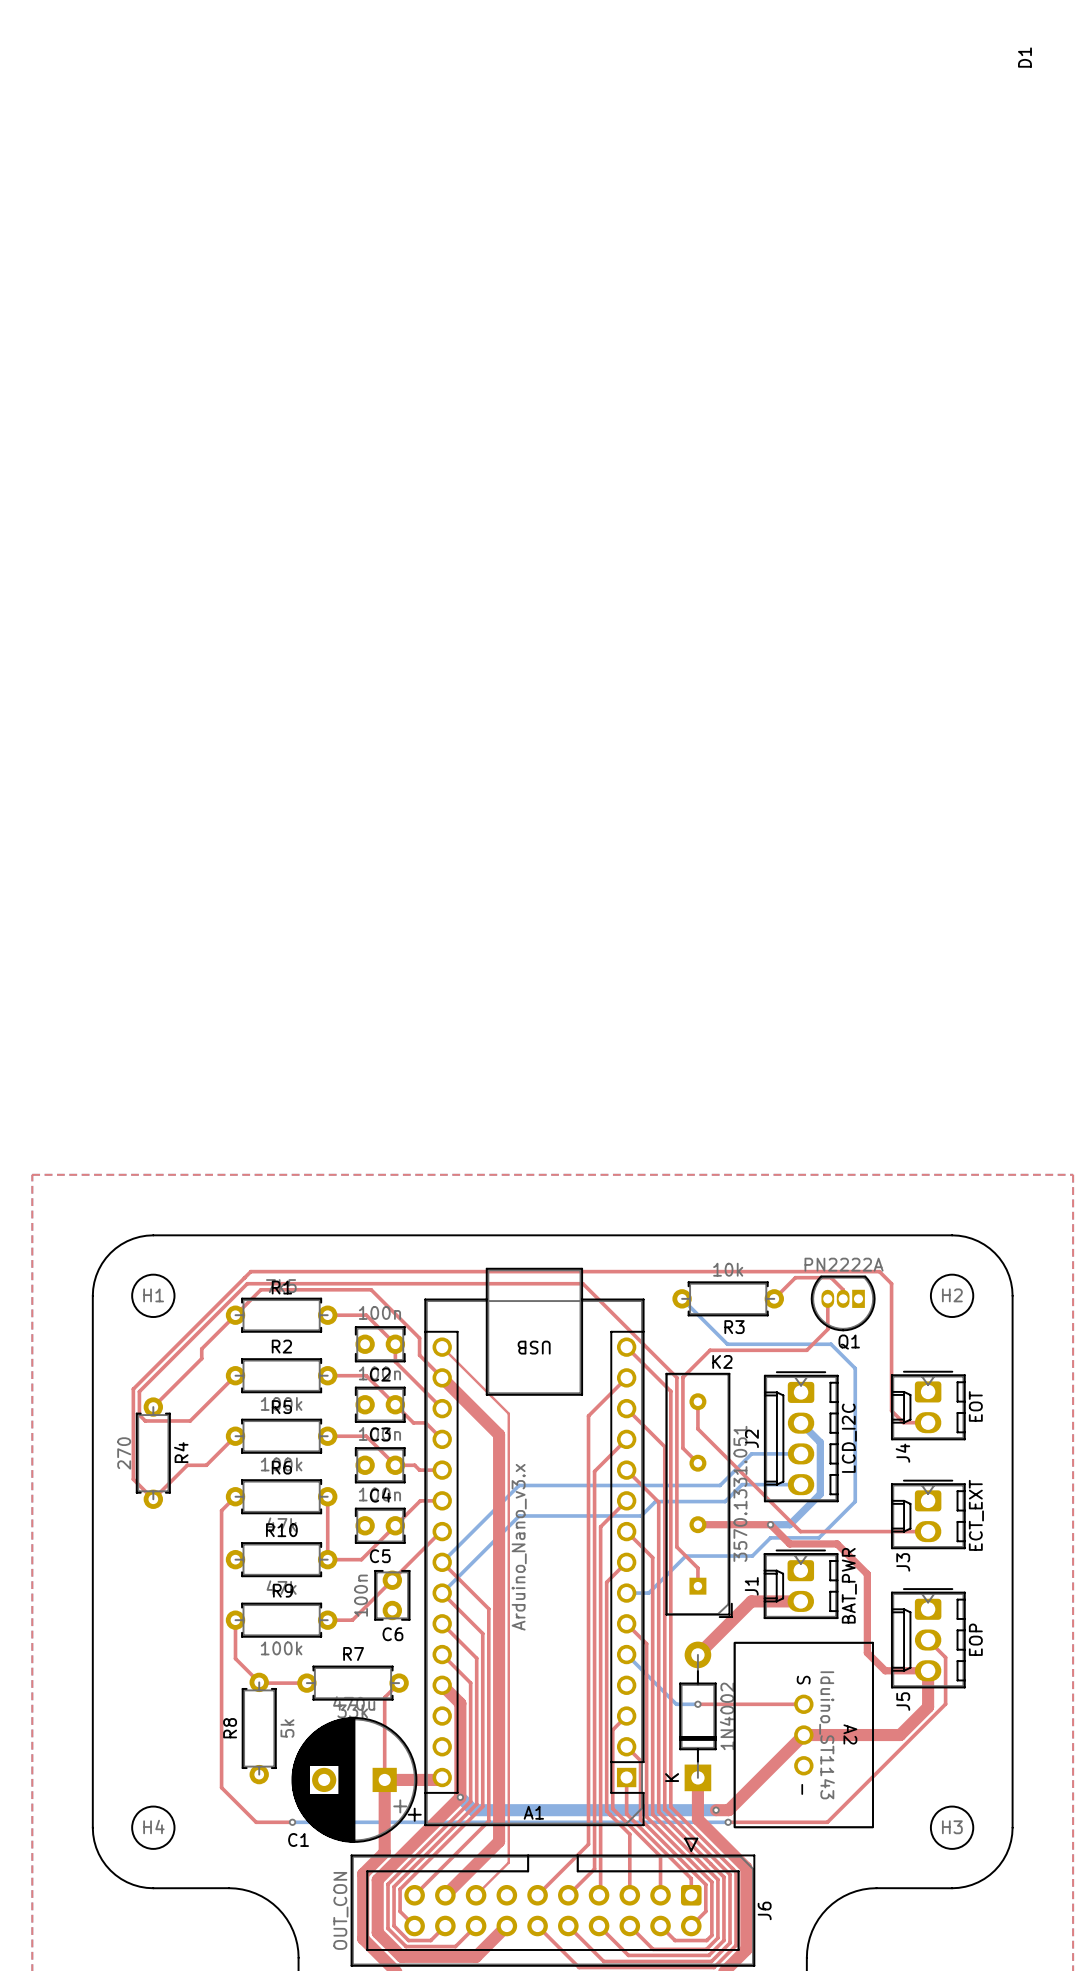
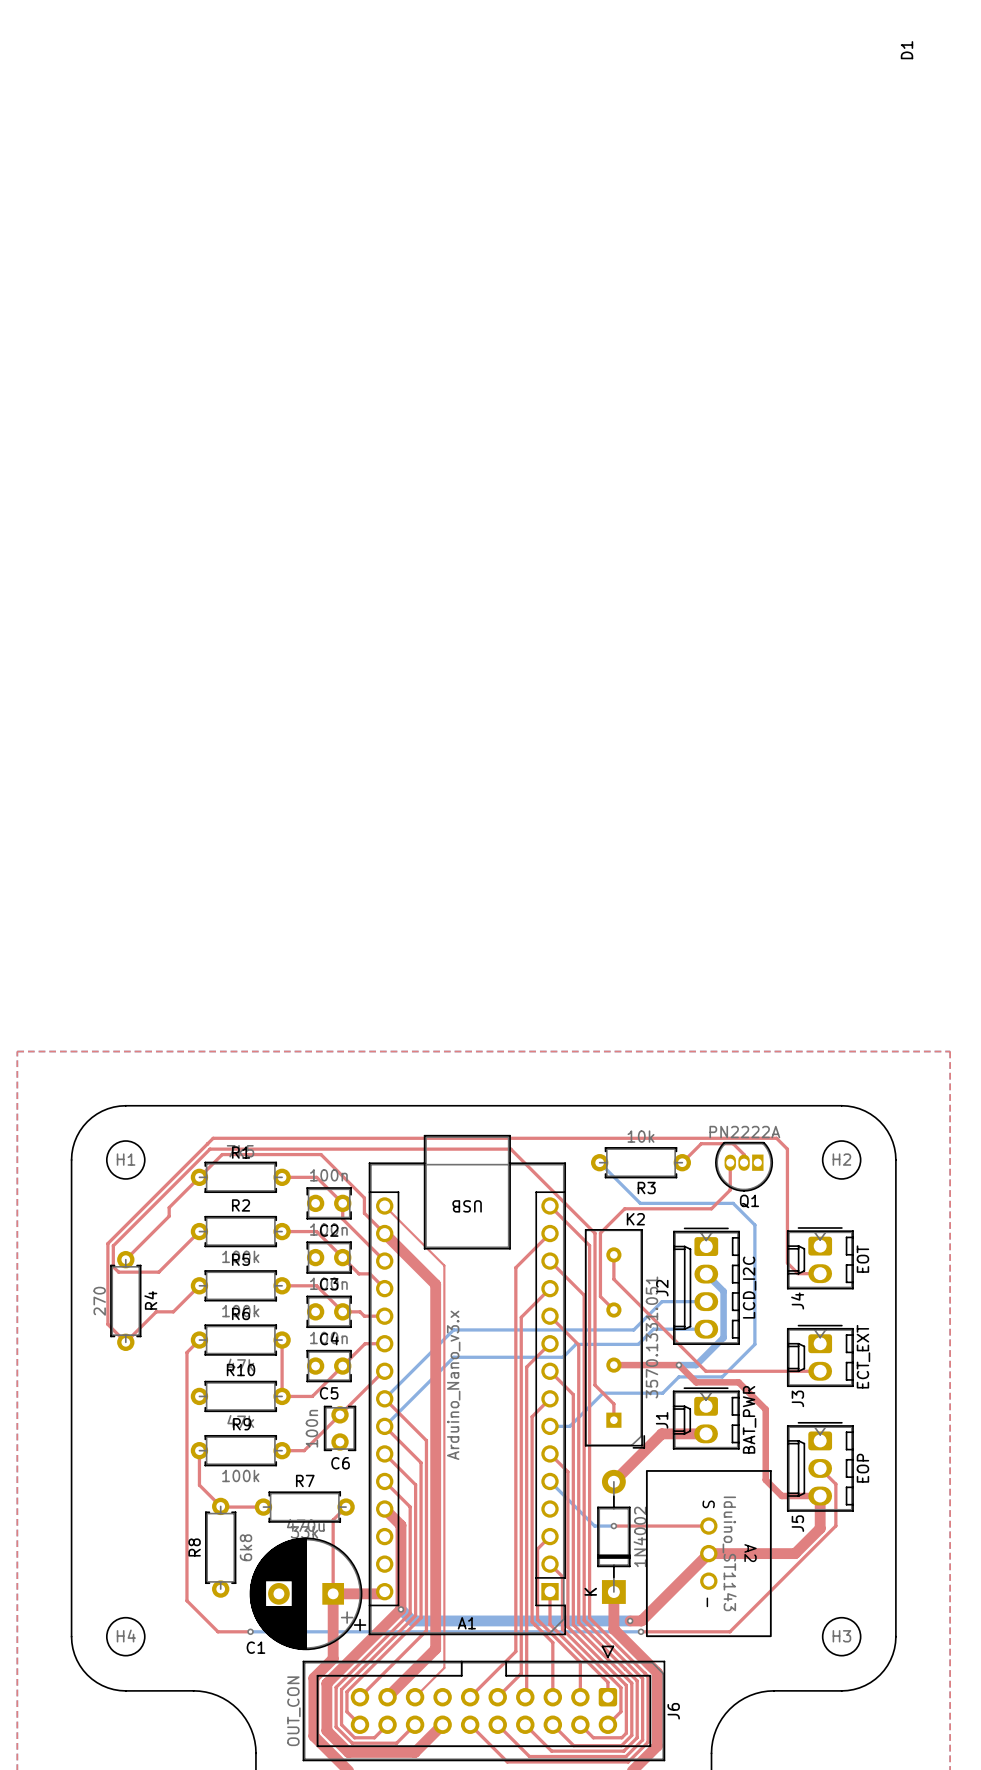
R8 value: 5k (287, 1728) -> 6k8 (246, 1547)

